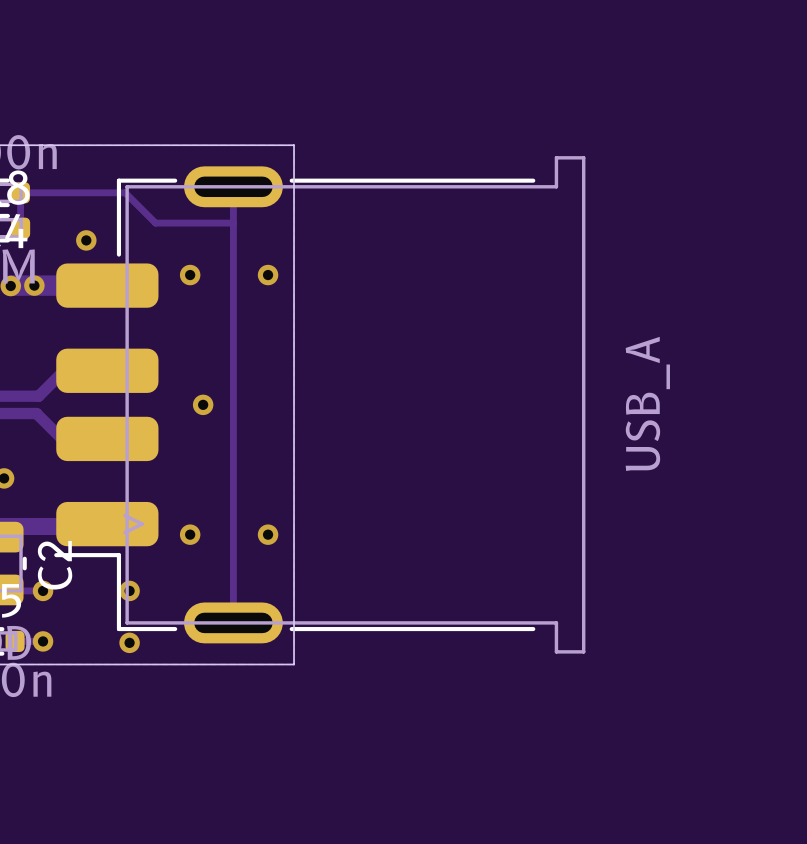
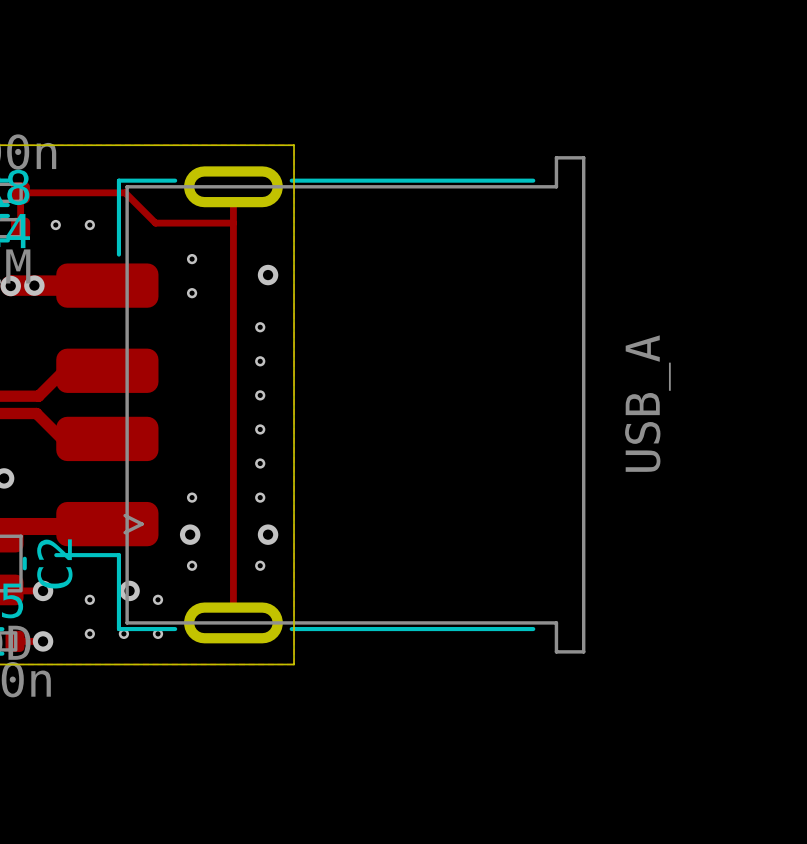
via: none -> (55, 225)
via: none -> (89, 225)
via: (86, 240) -> none
via: none -> (192, 259)
via: (190, 275) -> none
via: none -> (192, 293)
via: none -> (260, 327)
via: none -> (260, 361)
via: none -> (260, 395)
via: (203, 404) -> none
via: none -> (260, 429)
via: none -> (260, 463)
via: none -> (192, 497)
via: none -> (260, 497)
via: none -> (192, 565)
via: none -> (260, 565)
via: none -> (89, 599)
via: none -> (158, 599)
via size: [119, 632, 140, 654] -> [118, 628, 130, 640]
via: none -> (89, 633)
via: none -> (158, 633)

